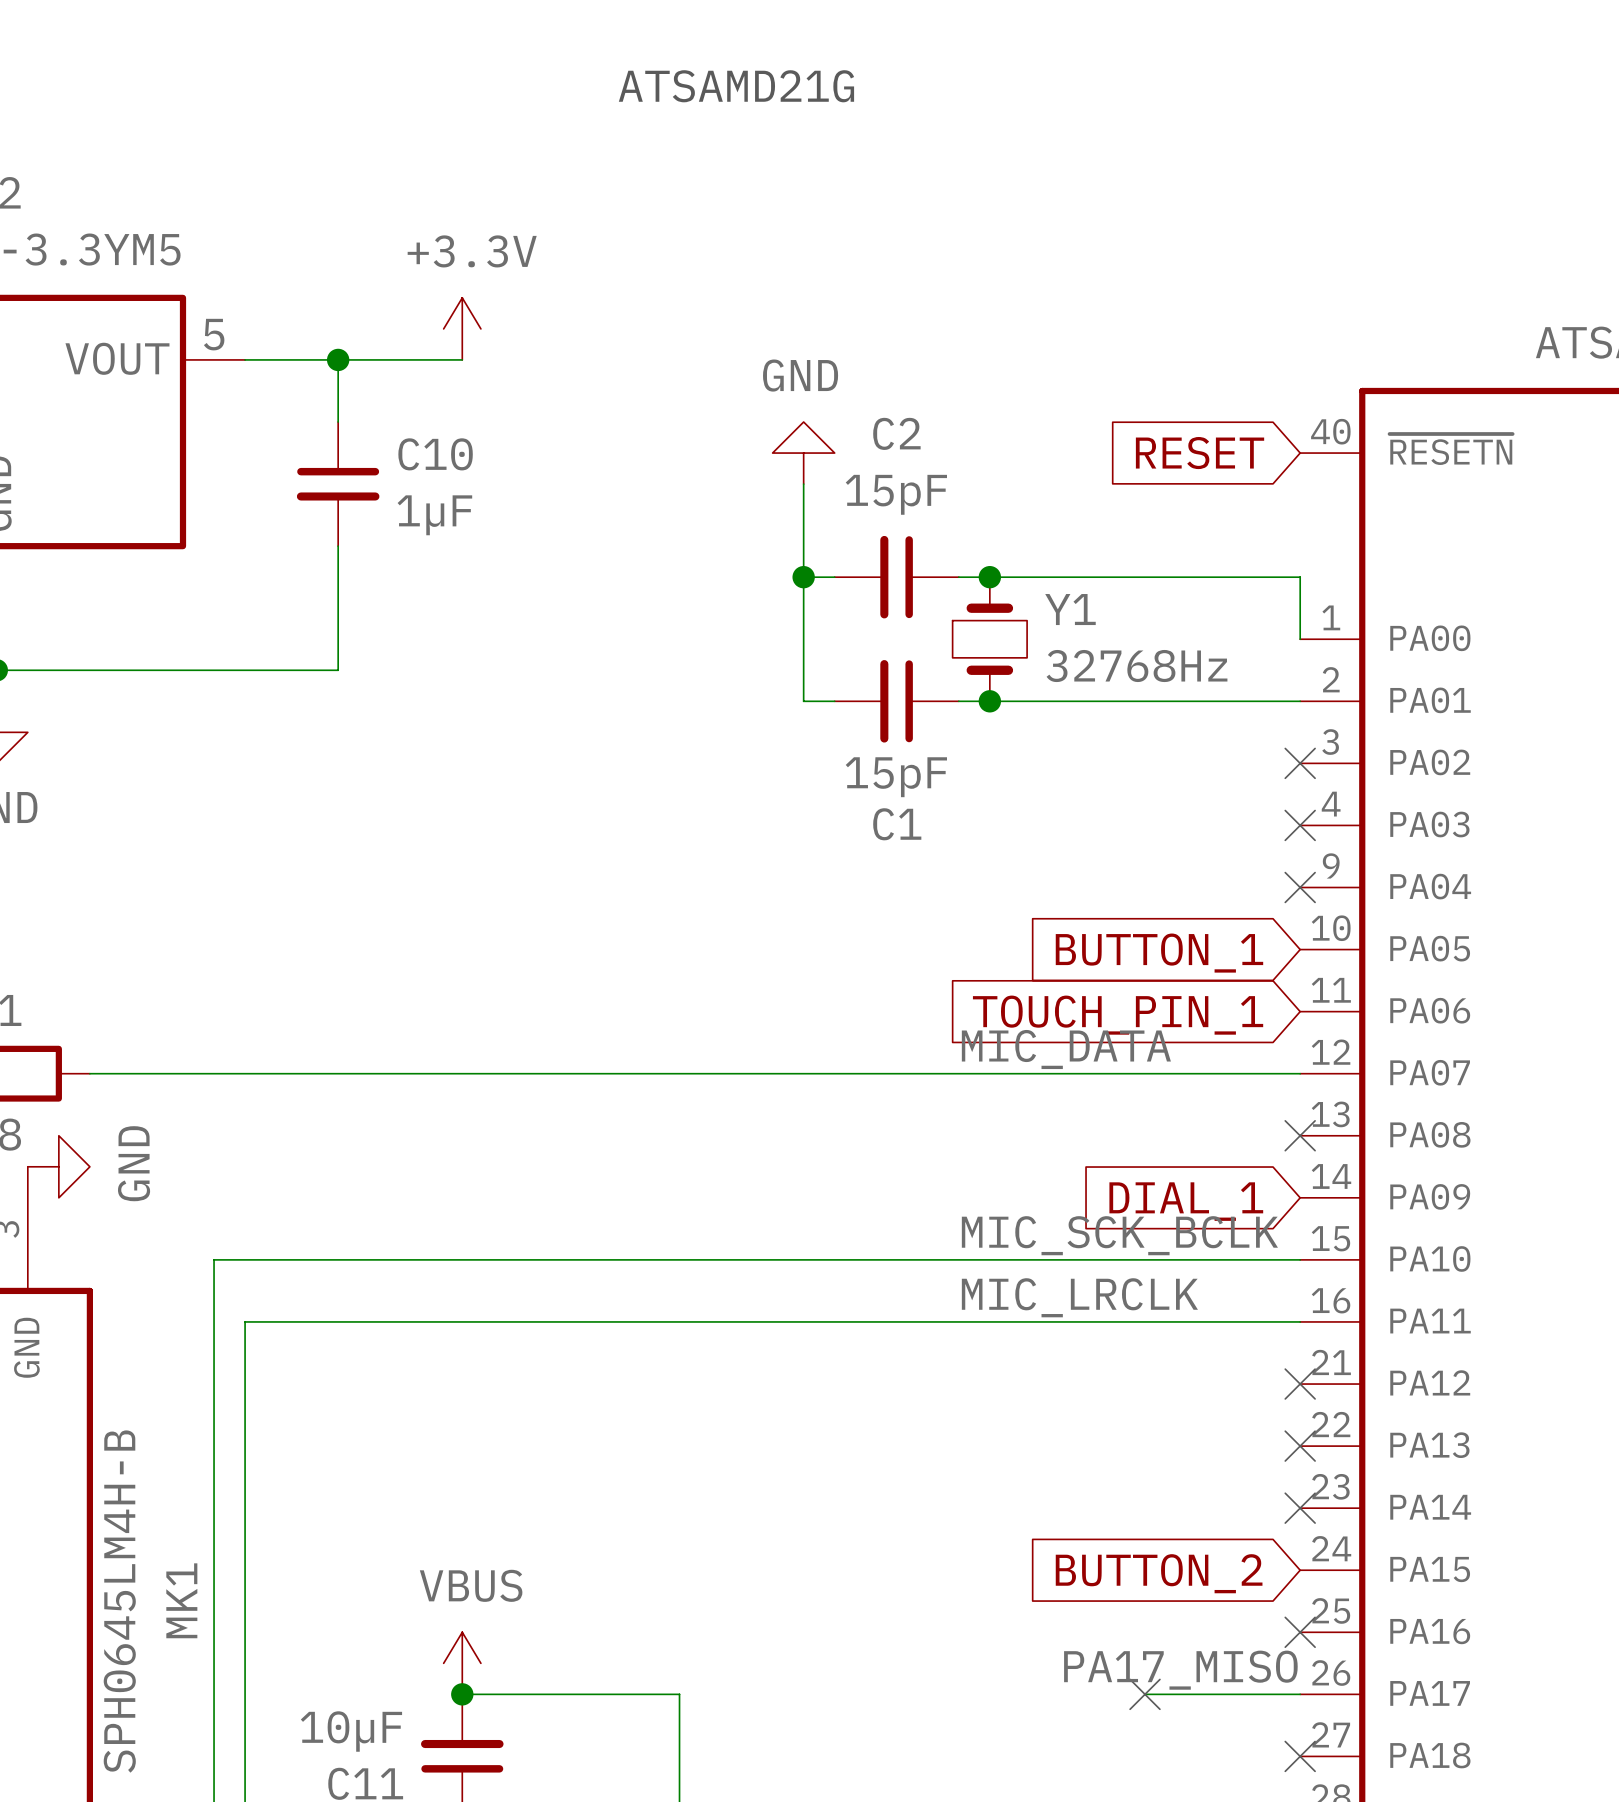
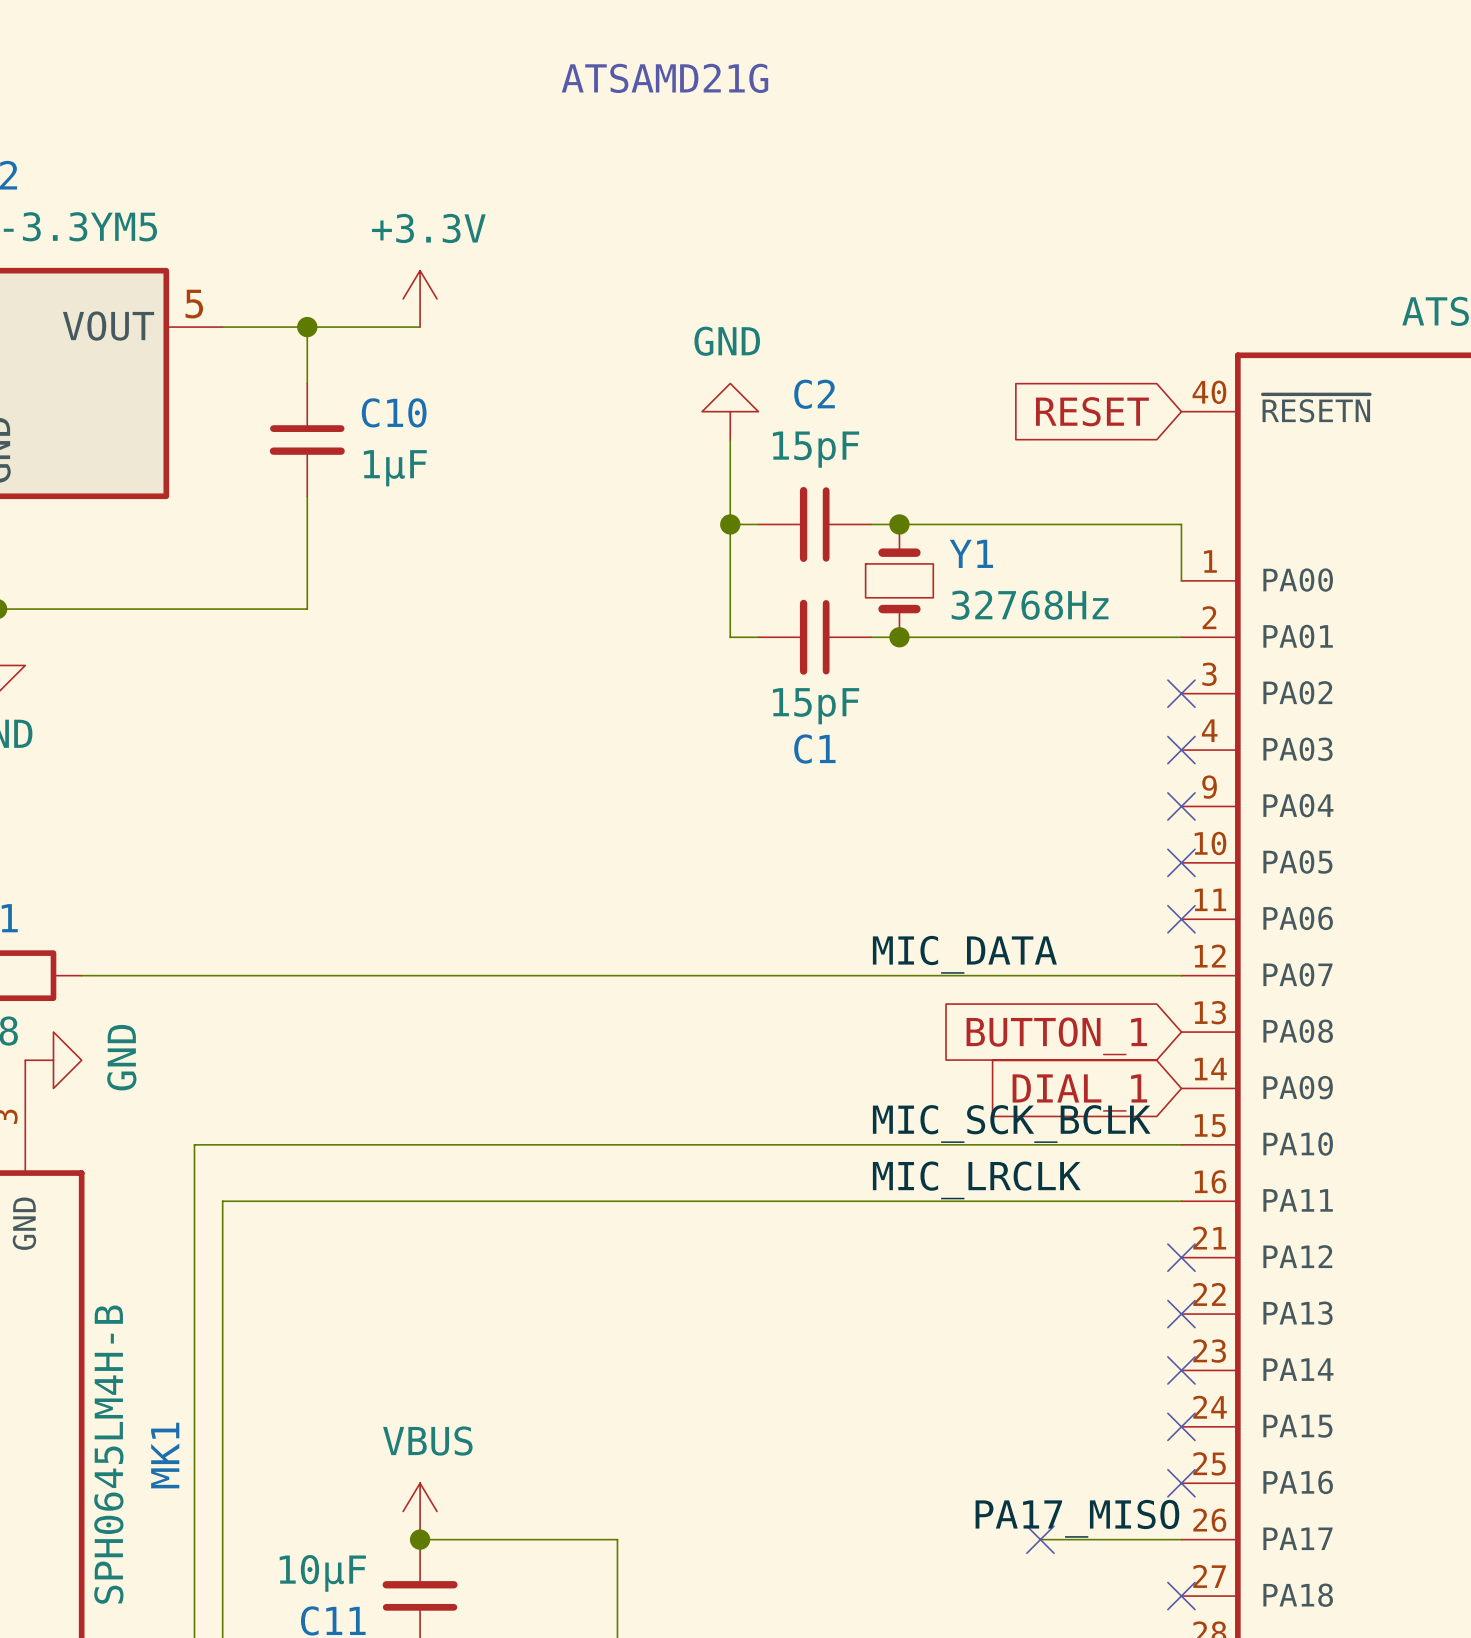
no-connect mark: none -> (1181, 862)
global label position: BUTTON_1 (1159, 953) -> BUTTON_1 (1056, 1036)
no-connect mark: none -> (1181, 919)
global label: TOUCH_PIN_1 (1118, 1015) -> none
no-connect mark: (1300, 1135) -> none
no-connect mark: none -> (1181, 1426)
global label: BUTTON_2 (1159, 1573) -> none

